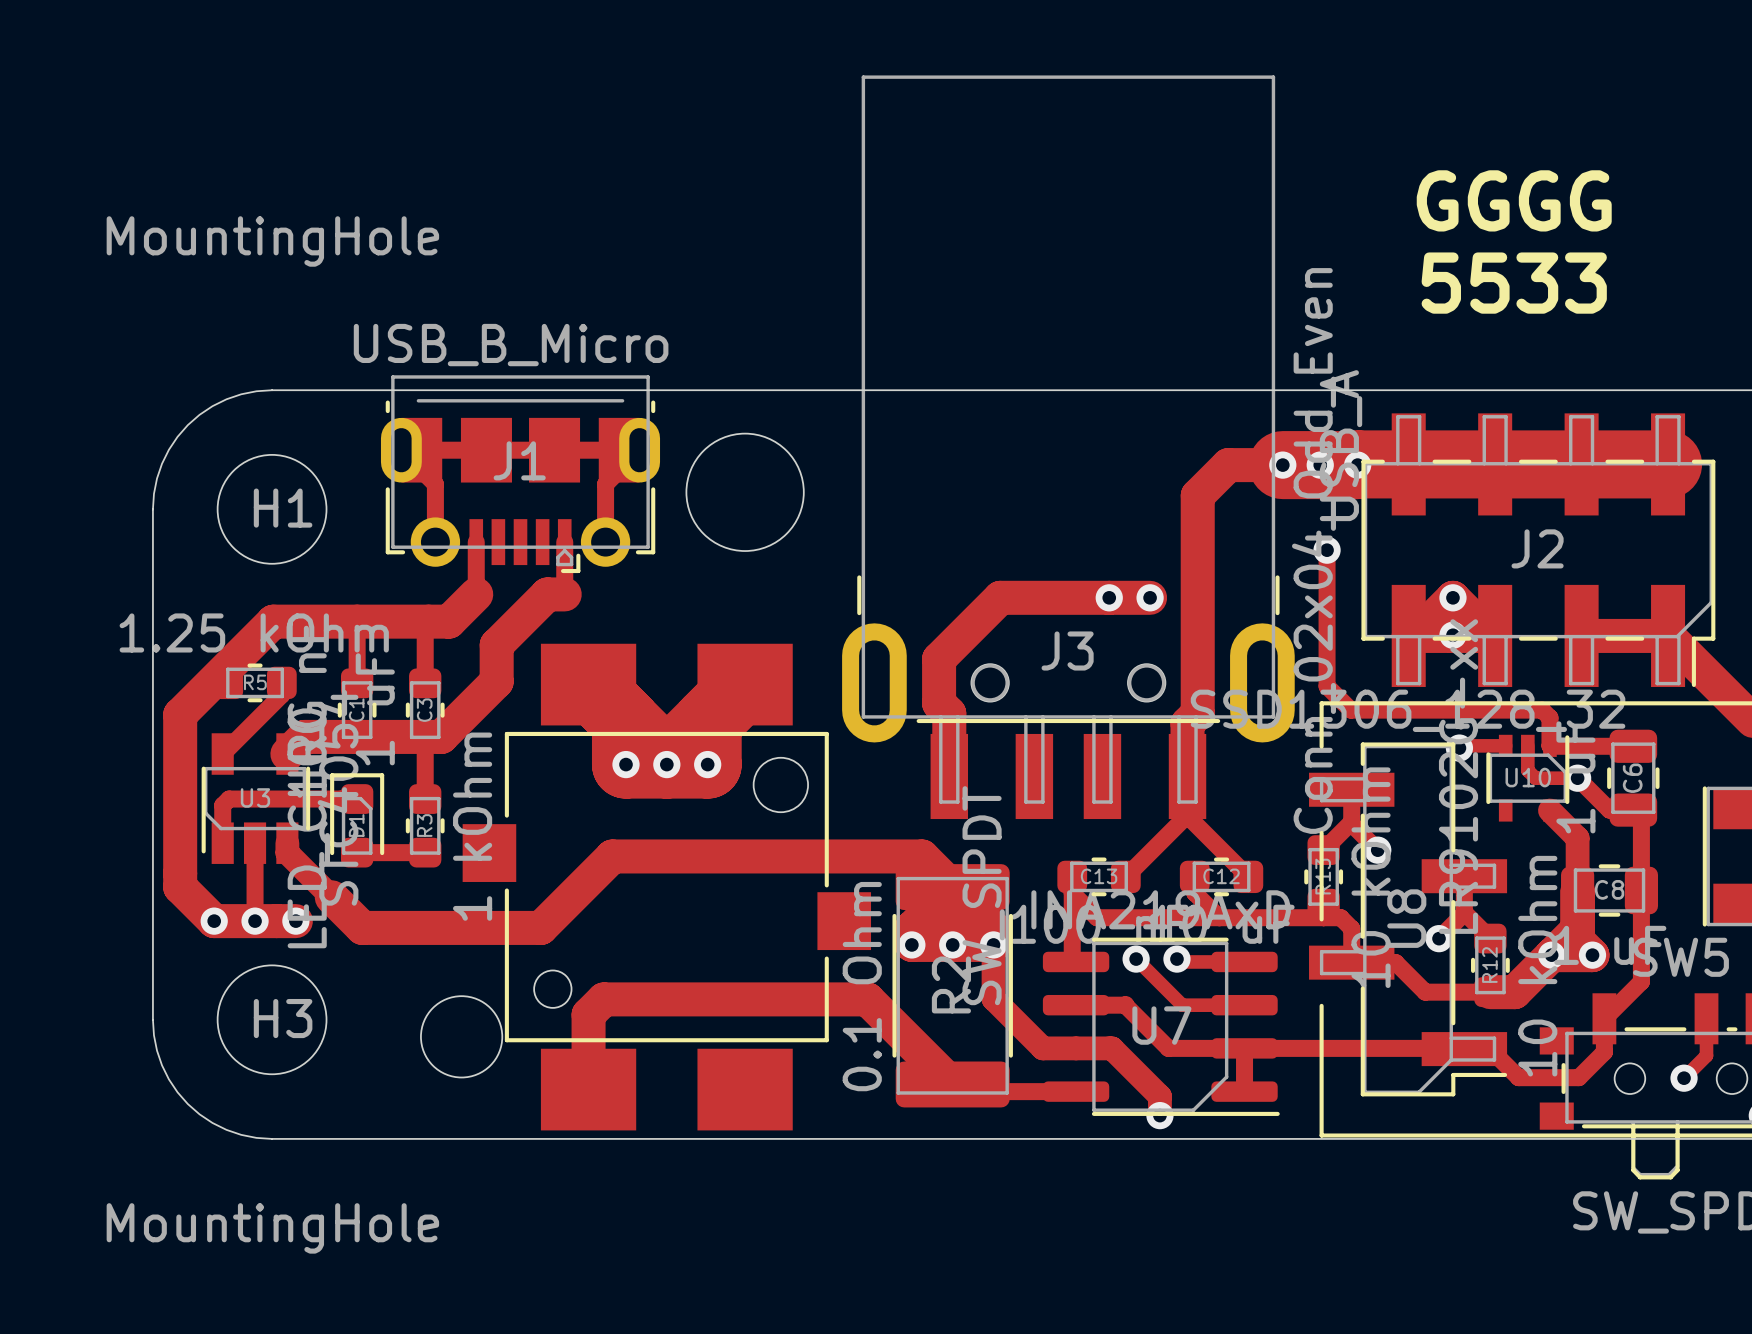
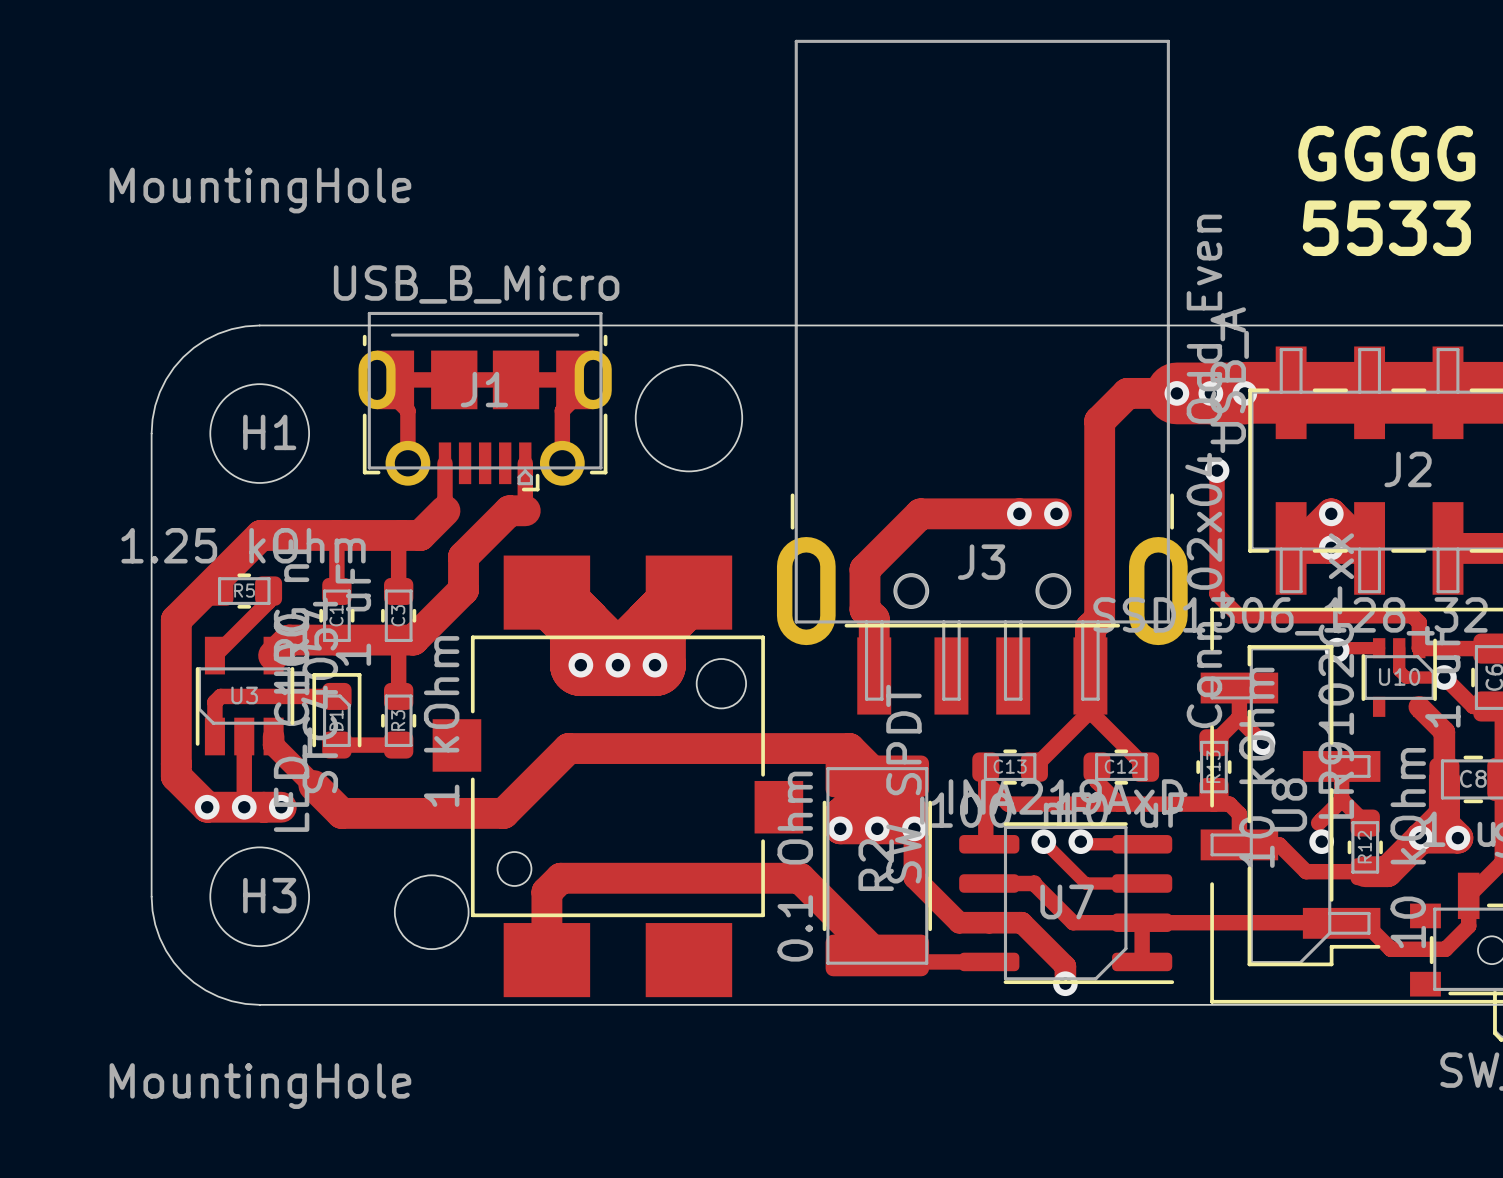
via position: (1439, 938) -> (1321, 841)

